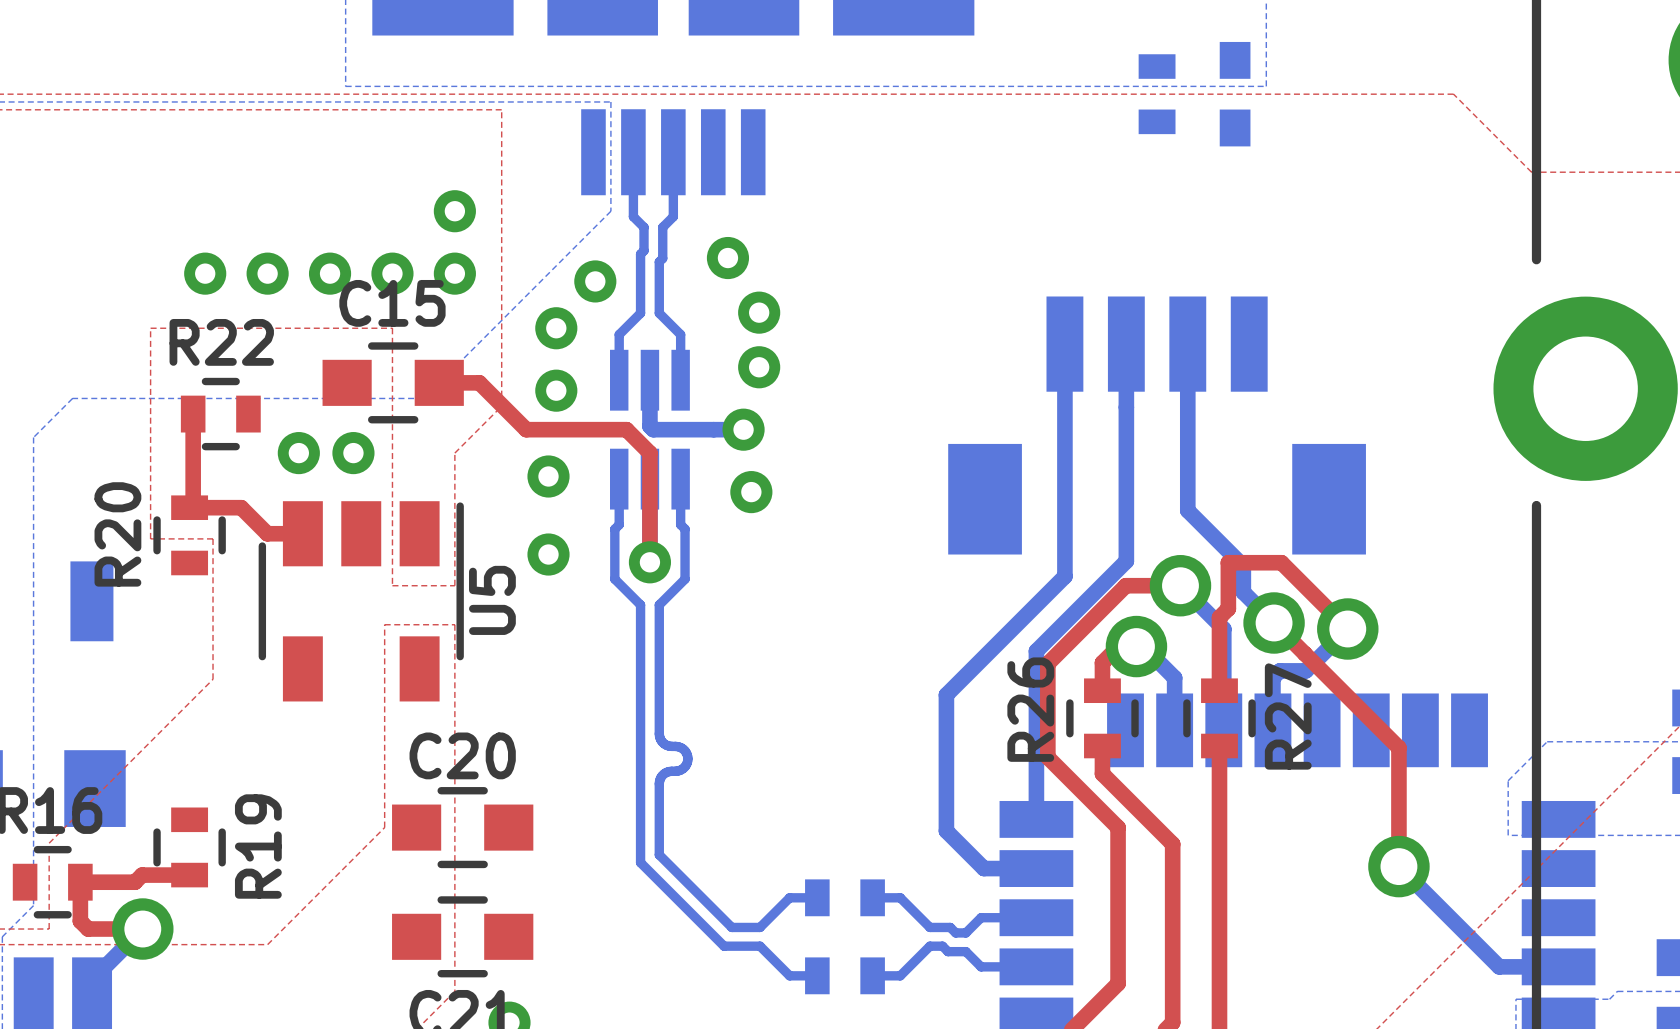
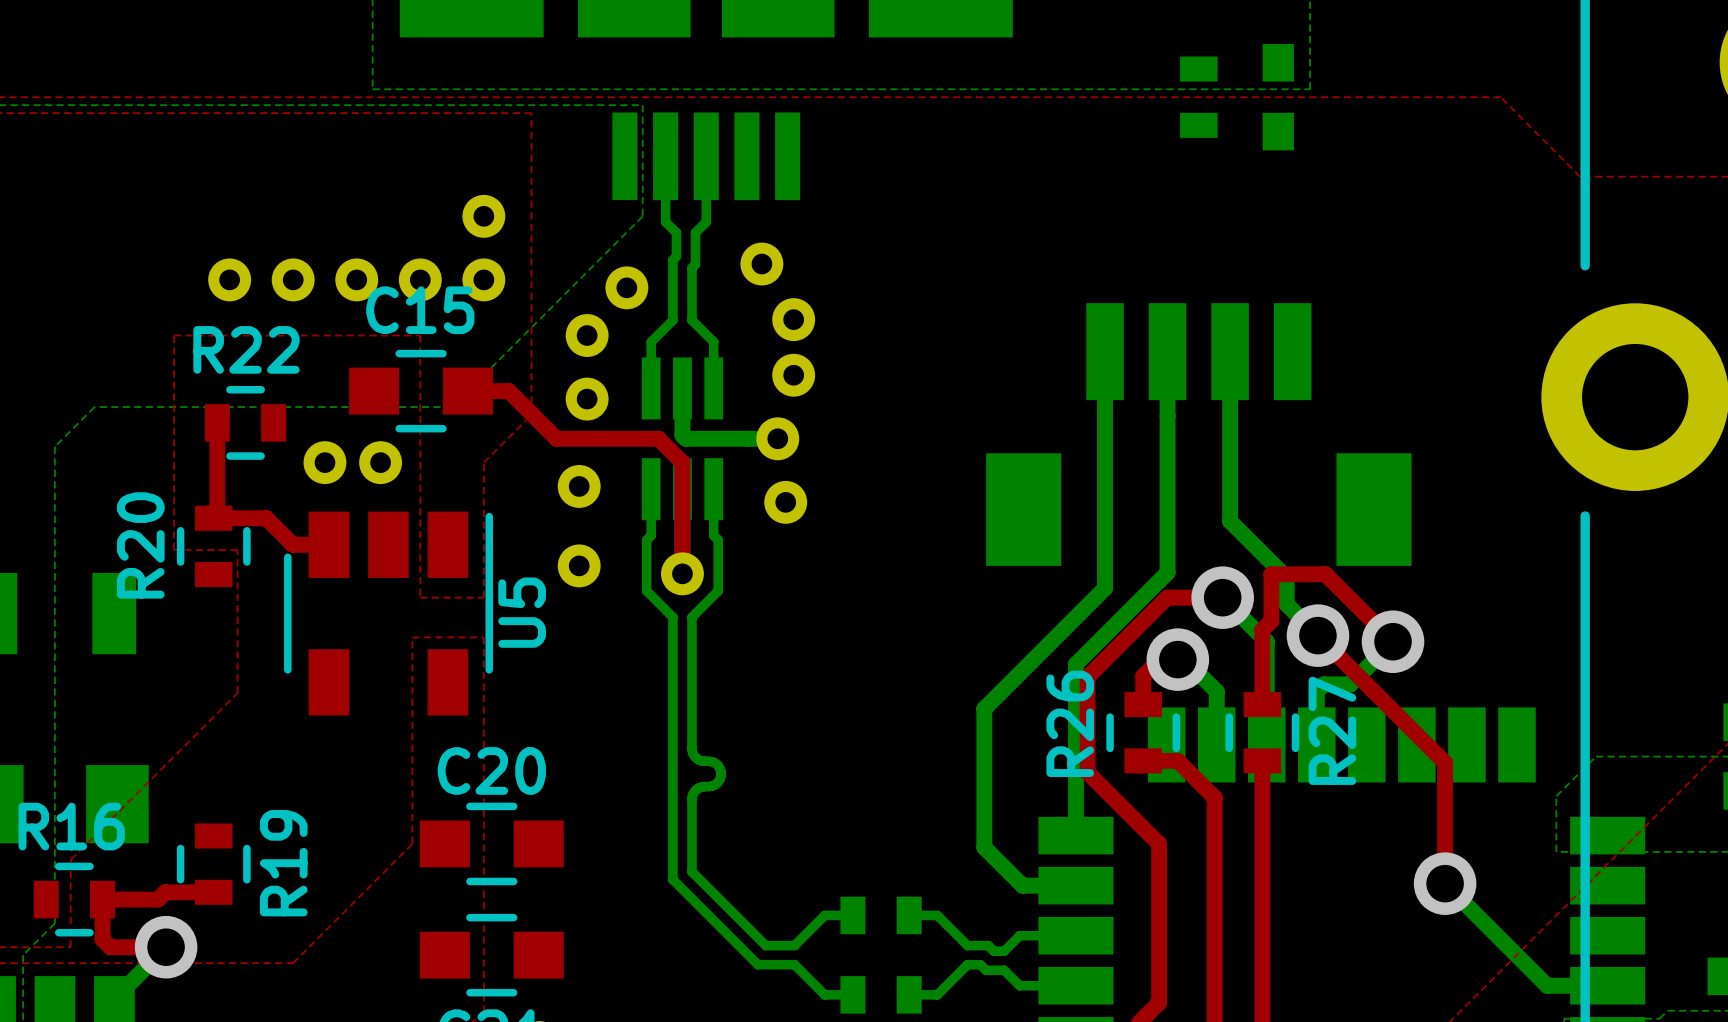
top track: (1102, 746) (1102, 773) (1172, 844) -> (1143, 760) (1177, 760) (1214, 797) (1214, 860)

